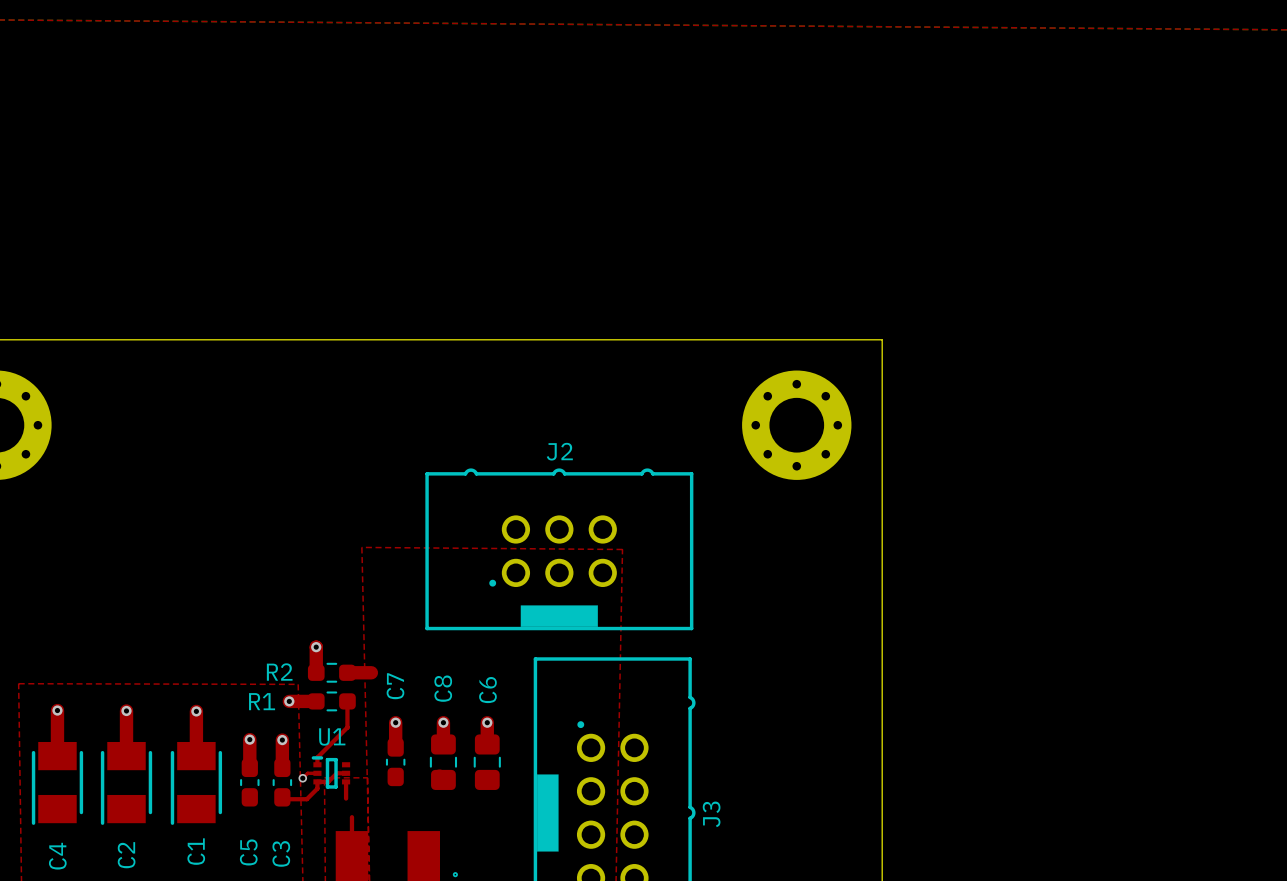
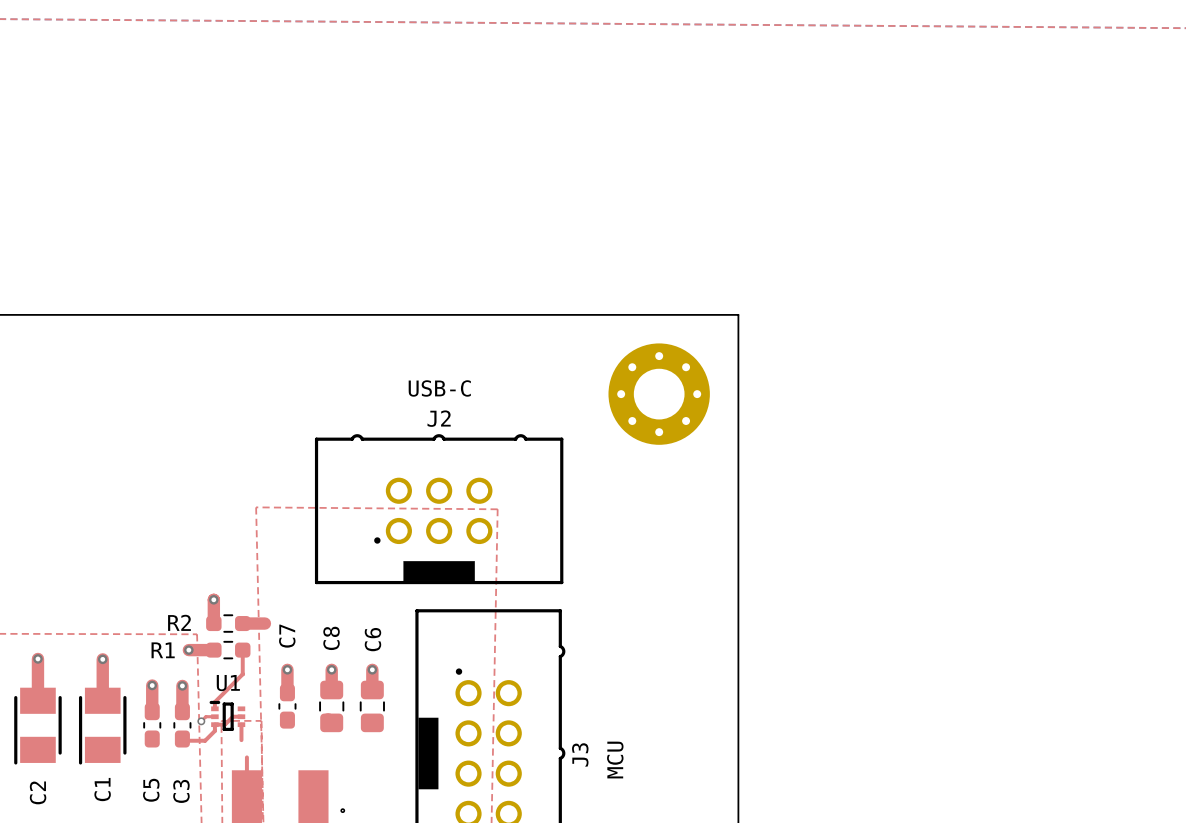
text: none -> USB-C (439, 388)
text: none -> MCU (615, 760)

